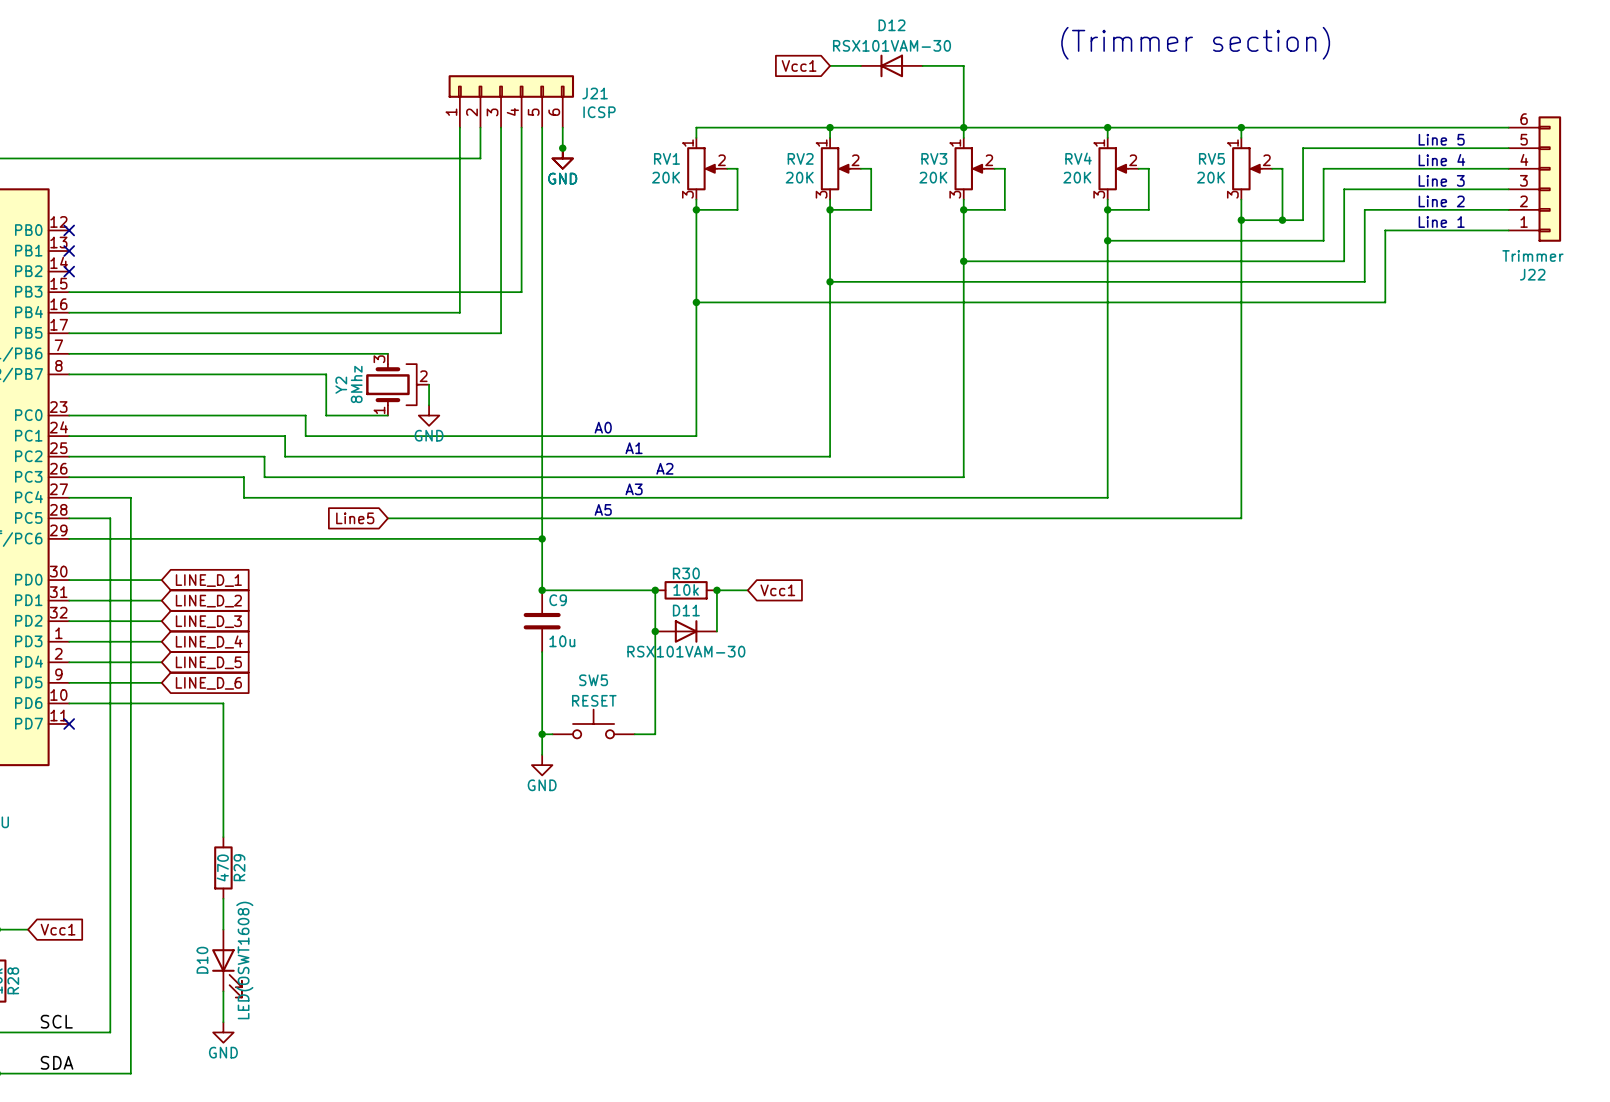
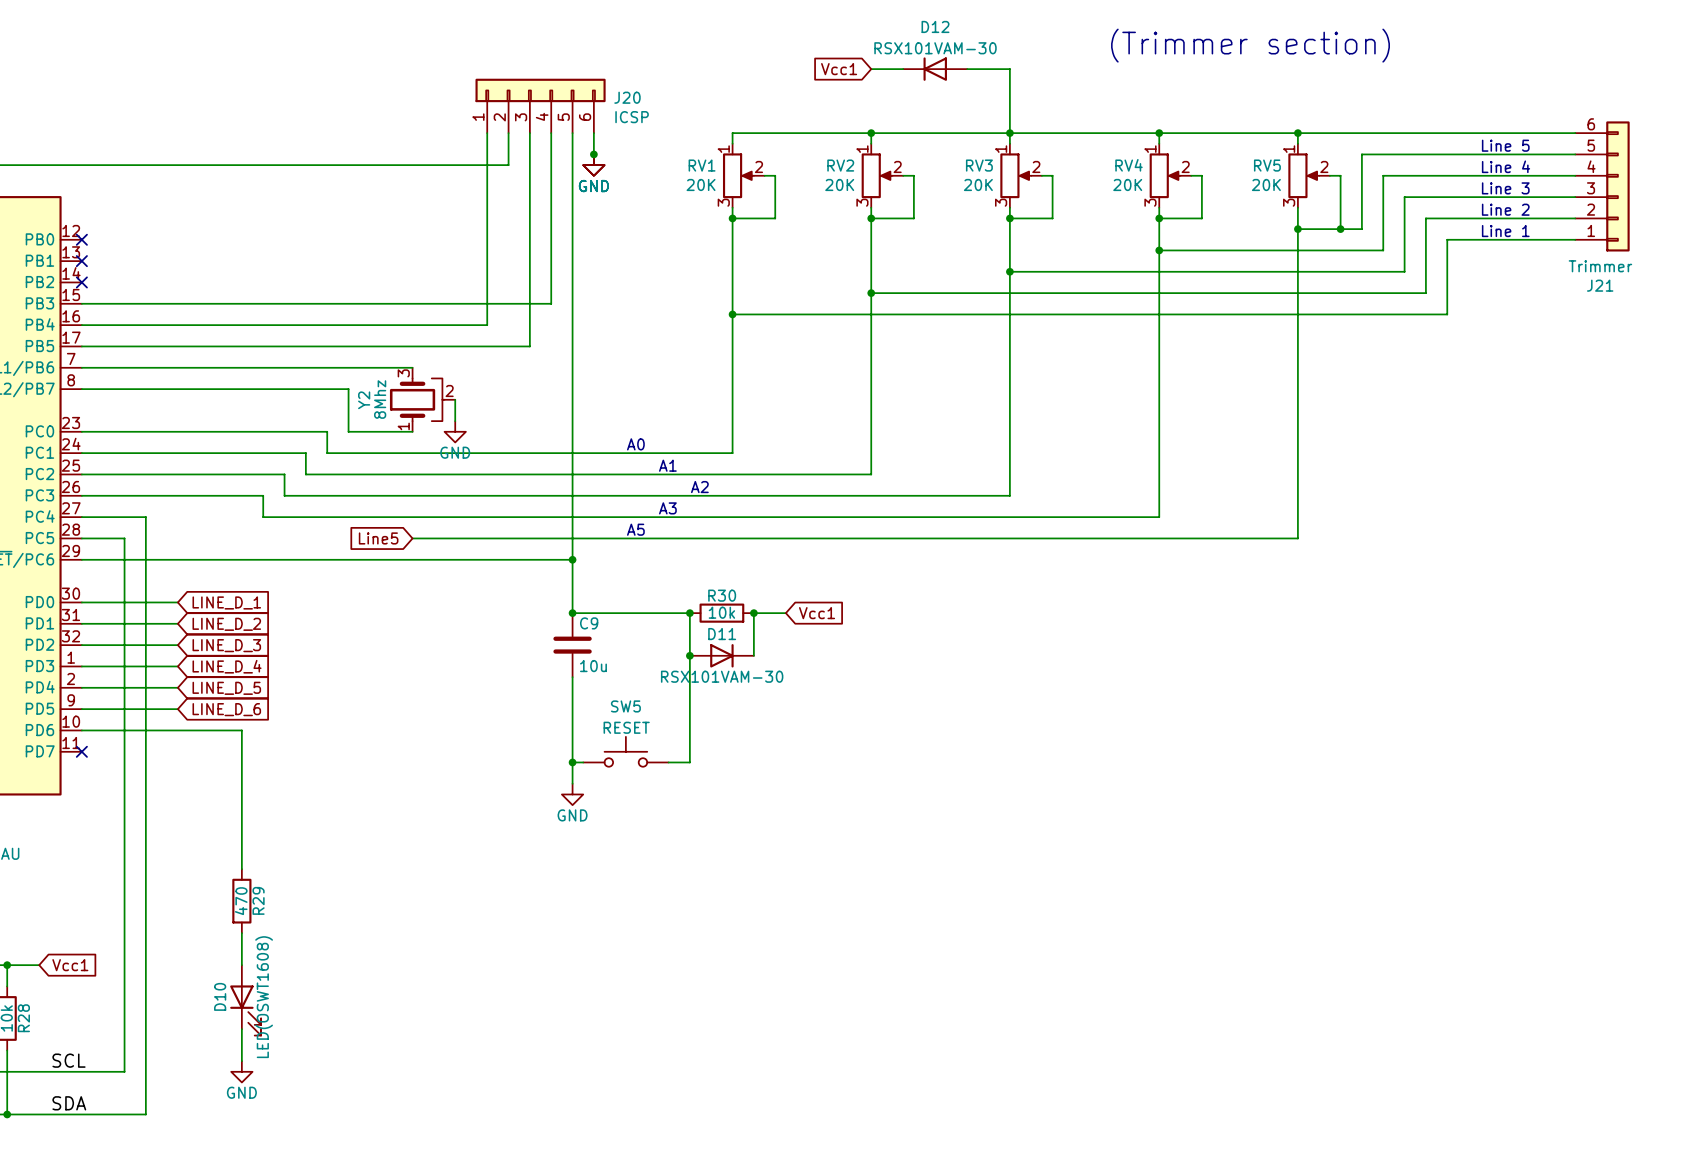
J21 name: J21 (595, 93) -> J20 (627, 97)
J22 name: J22 (1532, 274) -> J21 (1600, 285)

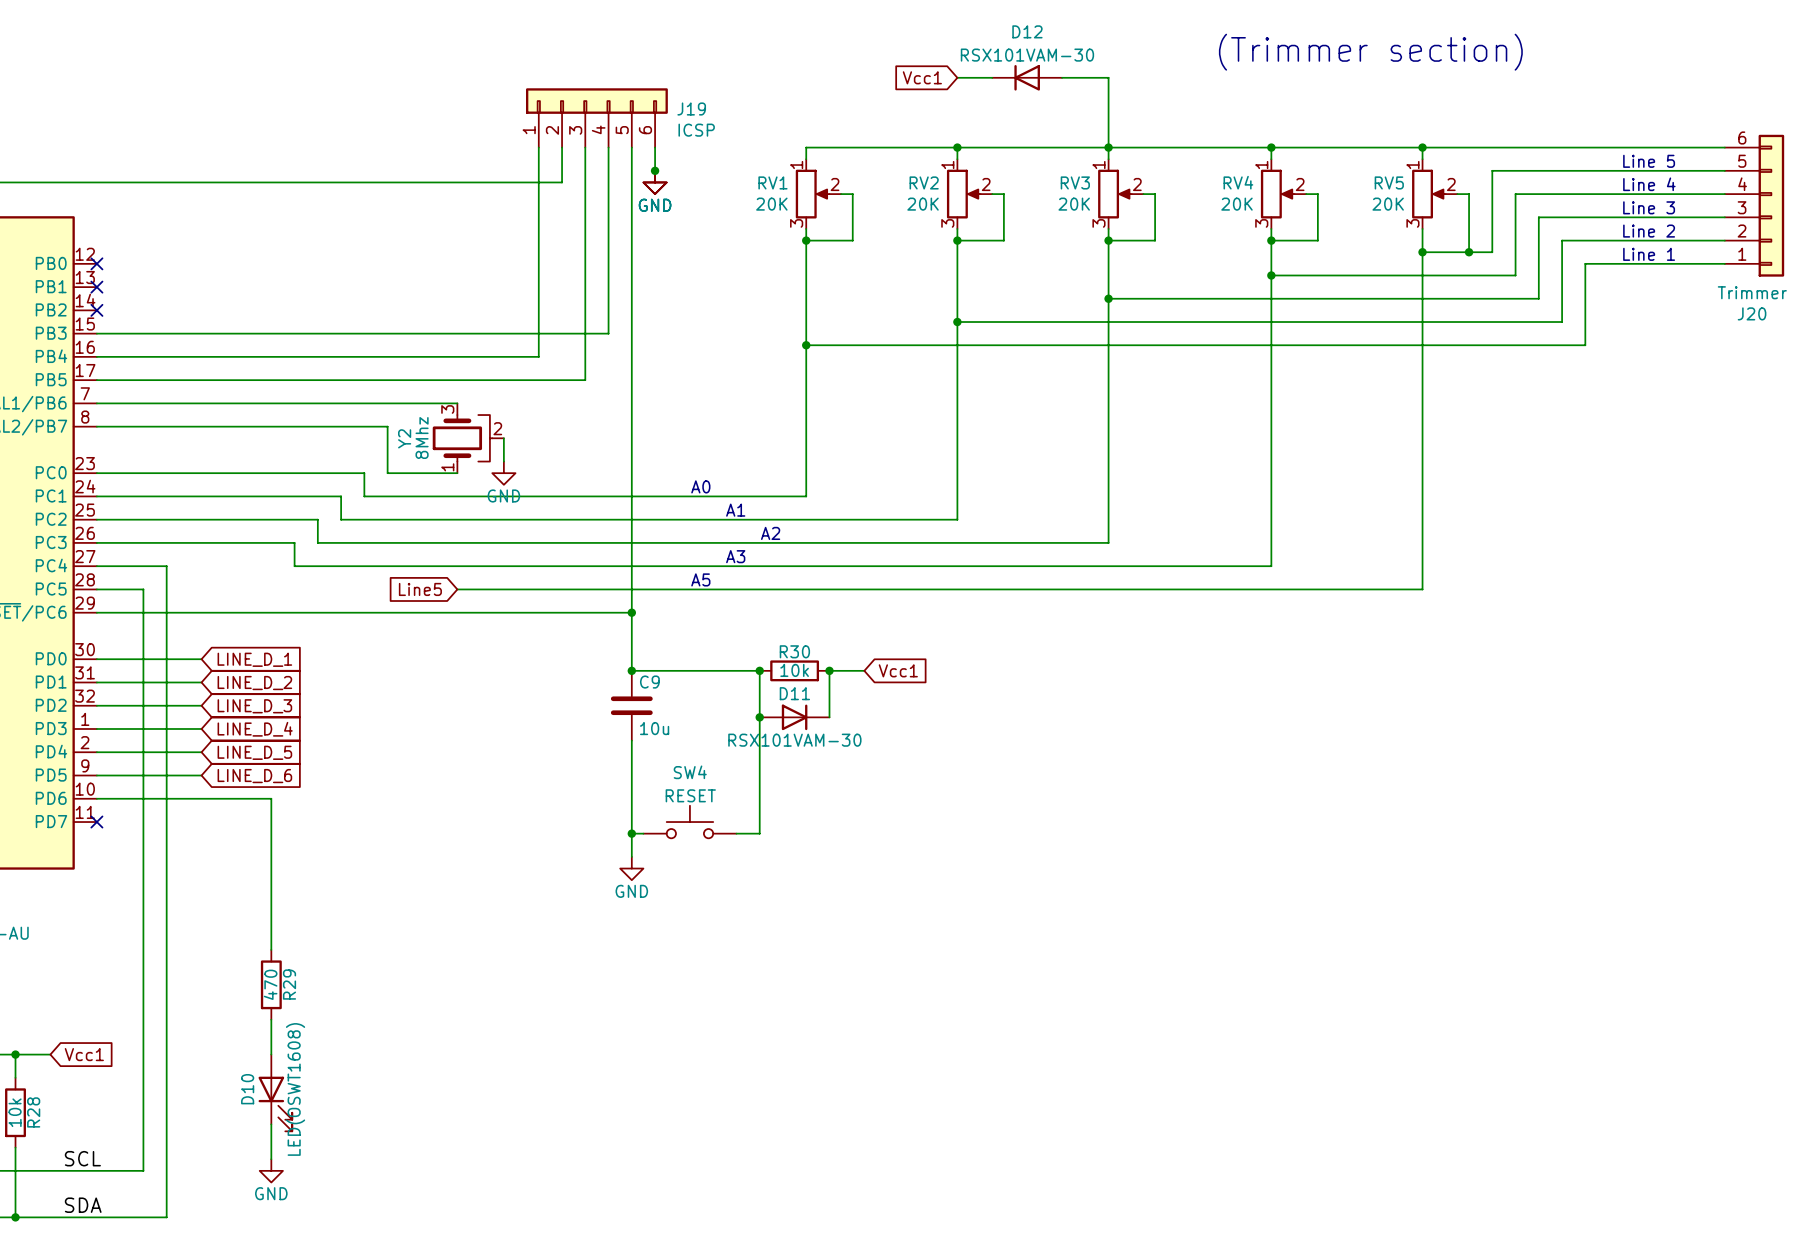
J20 name: J20 (627, 97) -> J19 (691, 109)
J21 name: J21 (1600, 285) -> J20 (1752, 313)
SW5 name: SW5 (625, 706) -> SW4 (690, 772)

